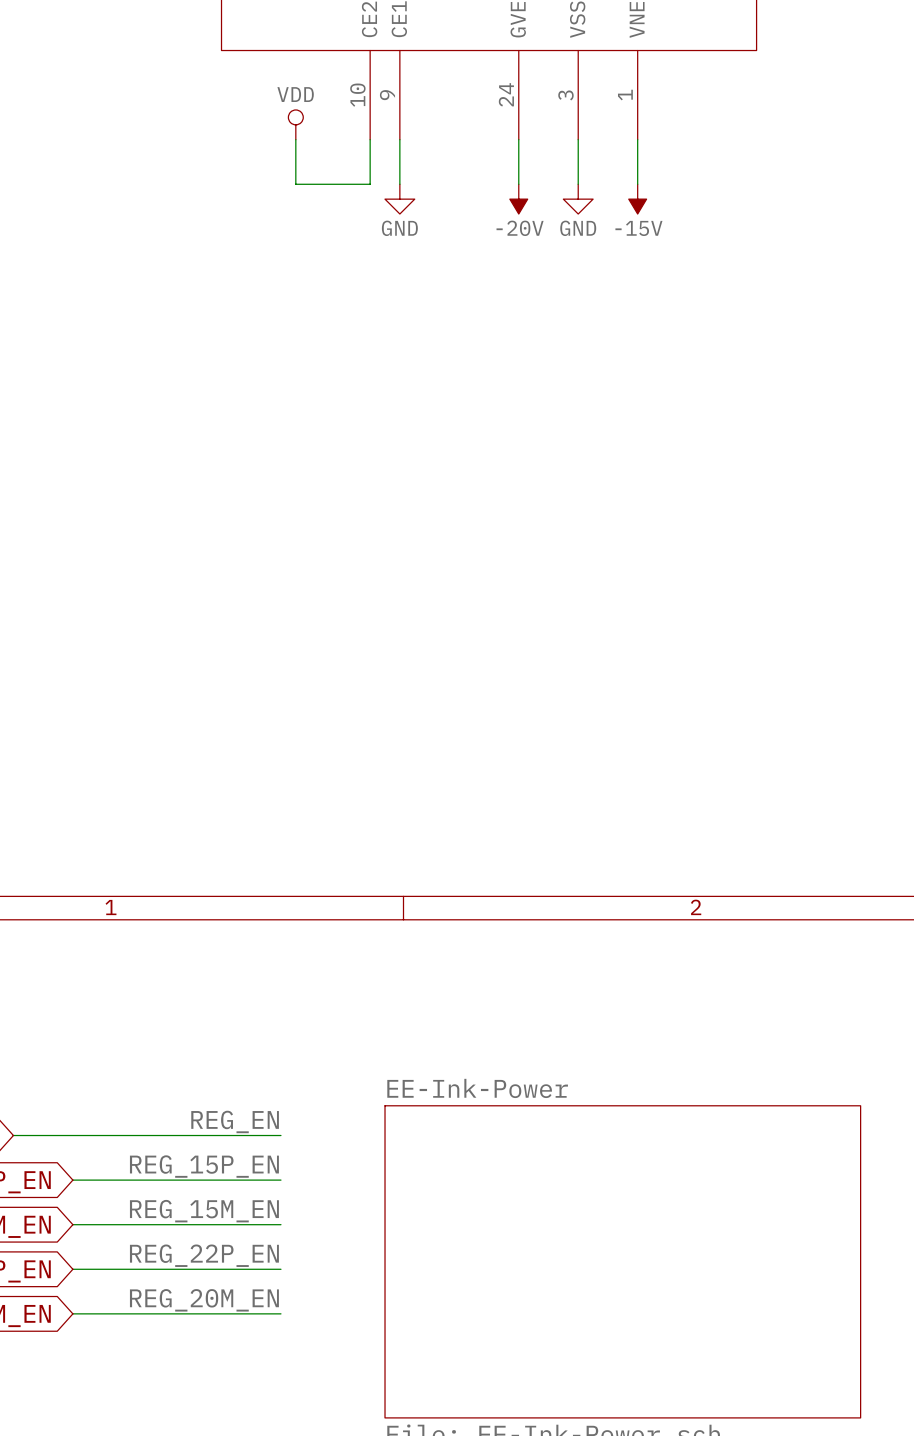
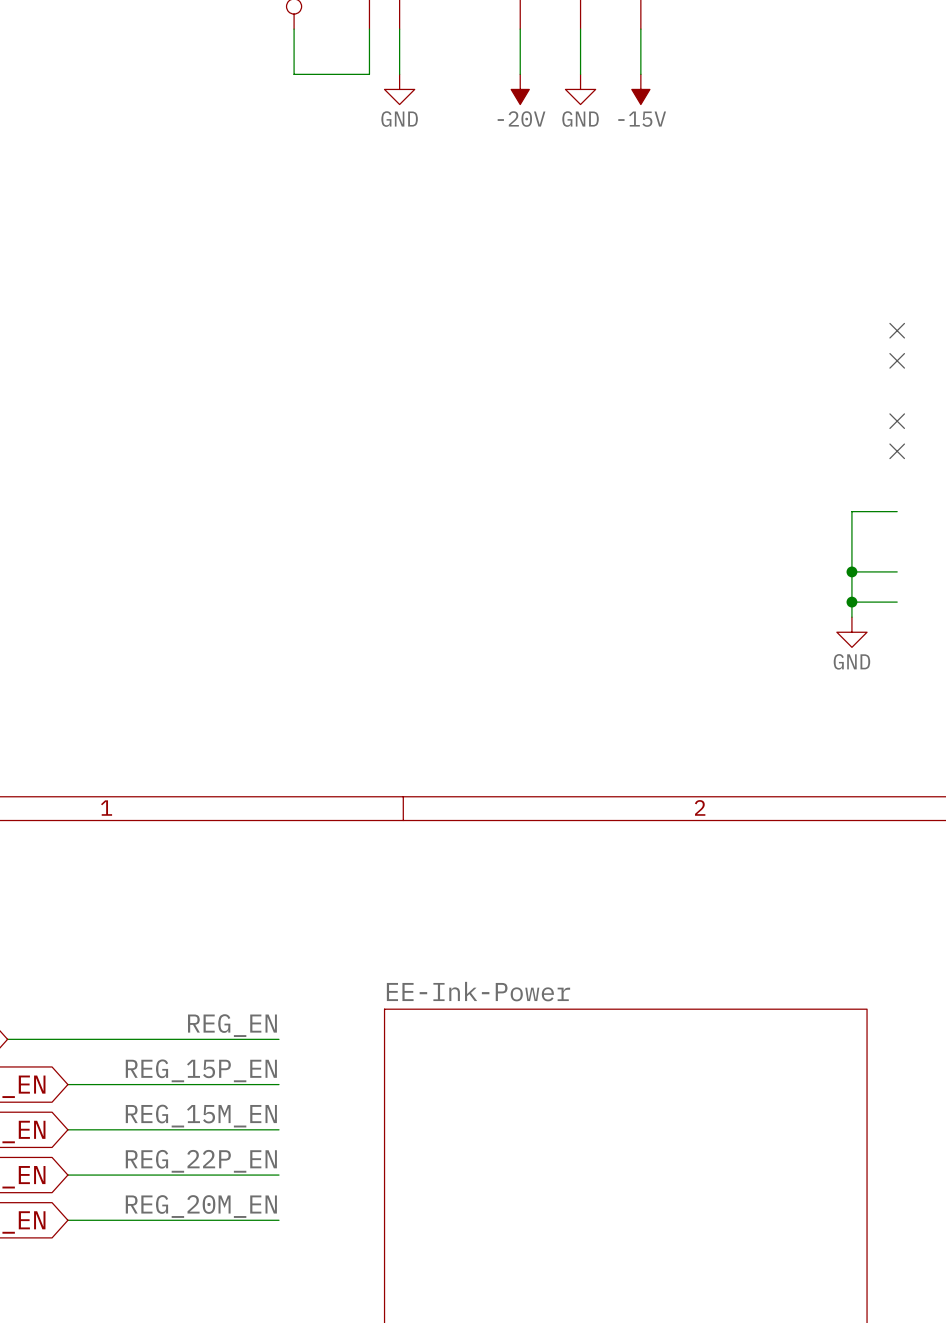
no-connect mark: none -> (897, 330)
no-connect mark: none -> (897, 360)
no-connect mark: none -> (897, 421)
no-connect mark: none -> (897, 451)
wire: none -> (897, 511) (851, 511) (851, 617)
wire: none -> (851, 571) (897, 571)
junction: none -> (851, 571)
wire: none -> (851, 602) (897, 602)
junction: none -> (851, 602)
power symbol: none -> GND (851, 632)

